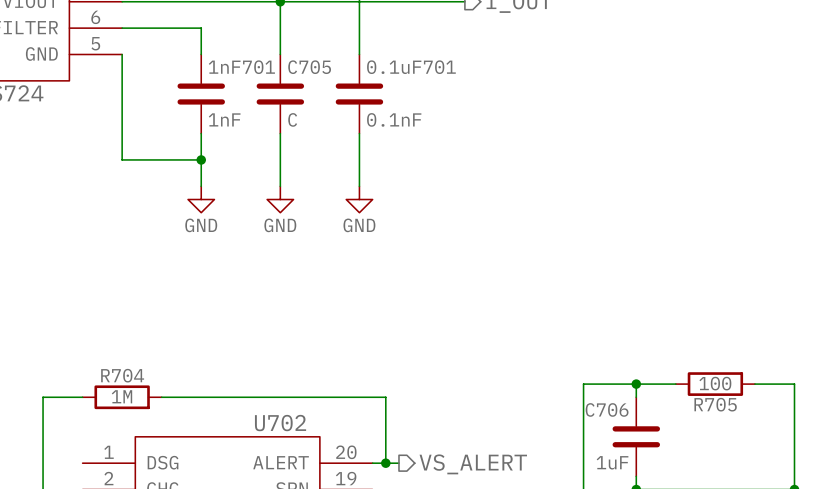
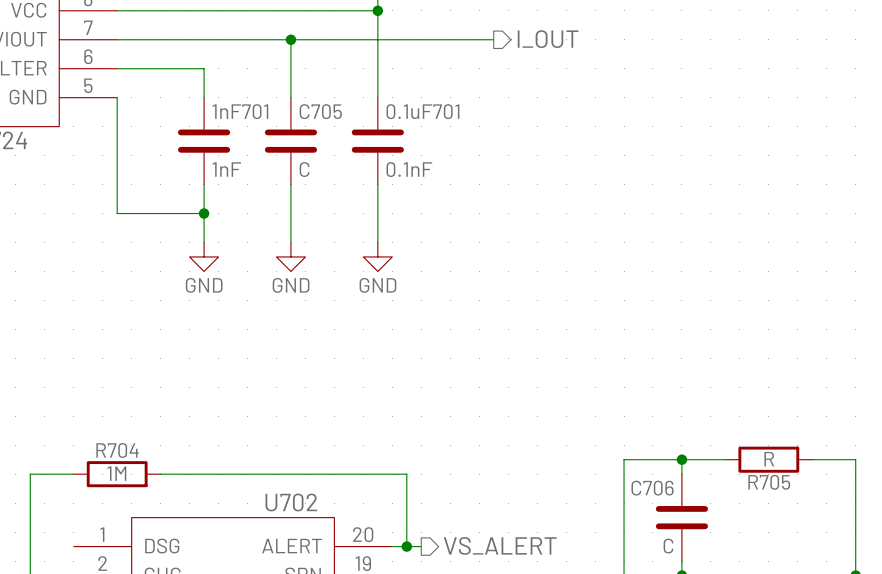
R705 value: 100 (715, 383) -> R (769, 459)
C706 value: 1uF (612, 462) -> C (668, 546)

